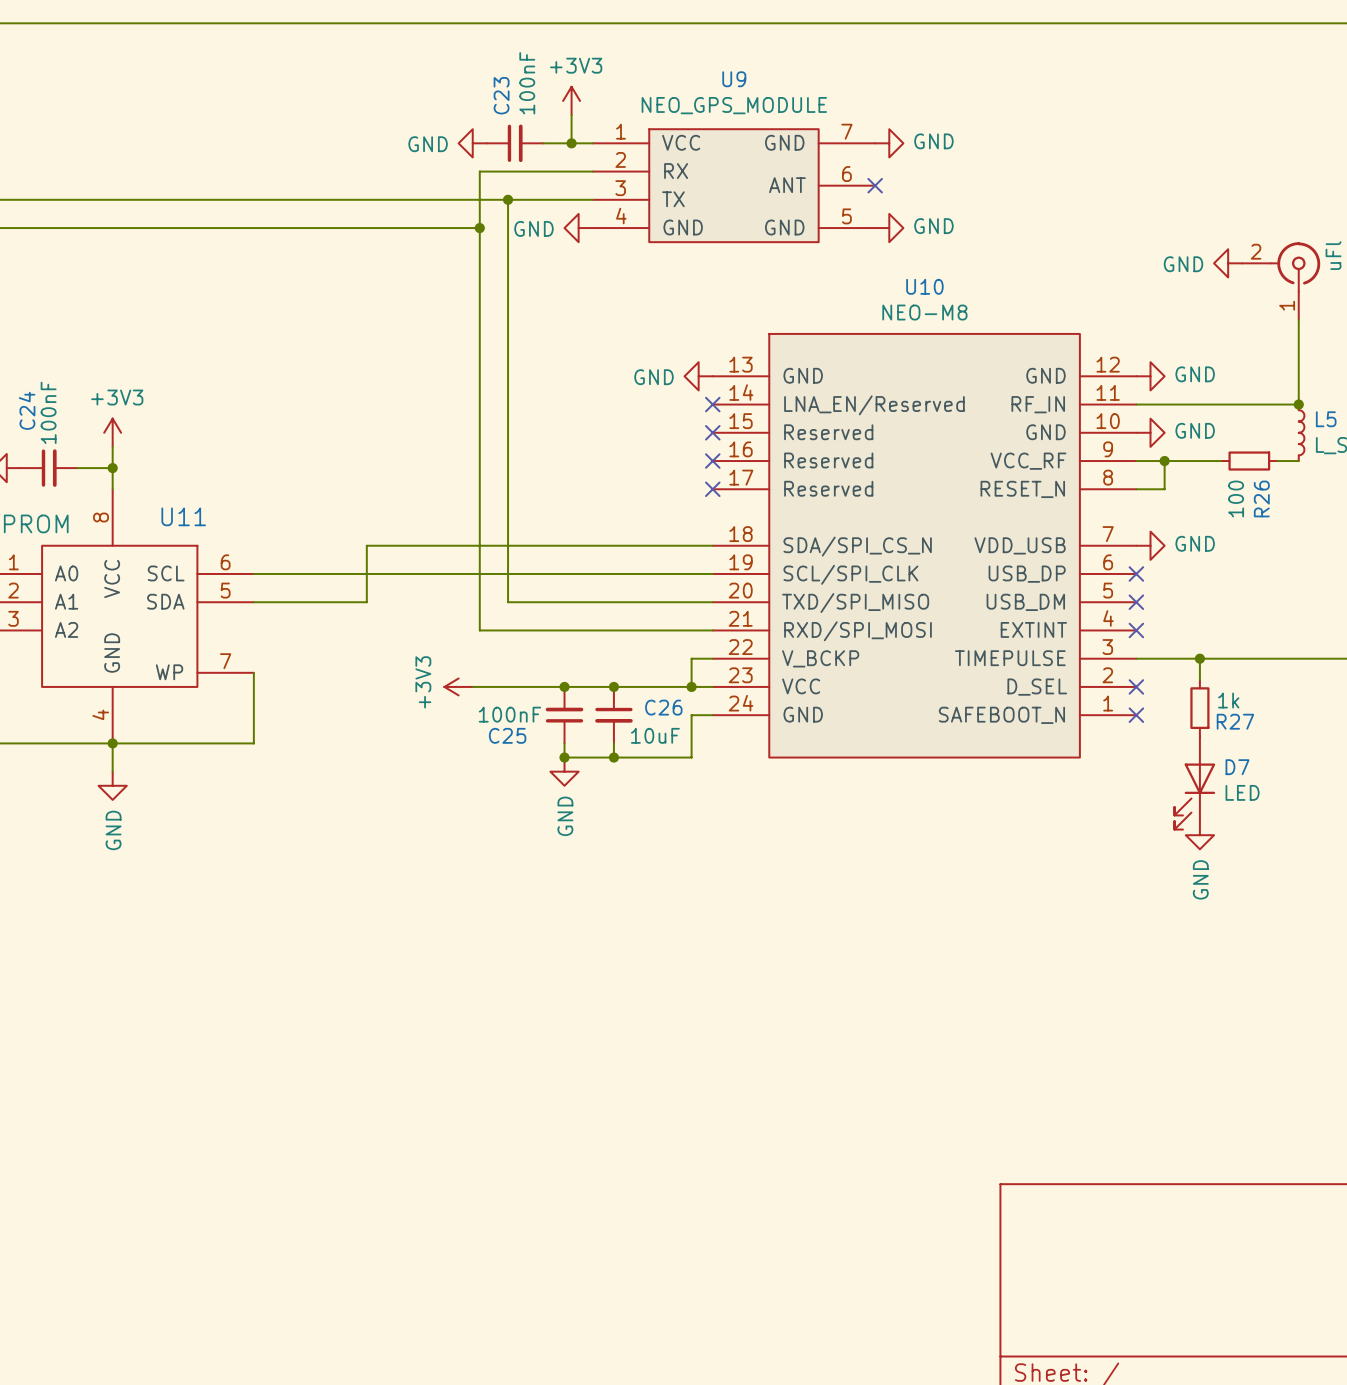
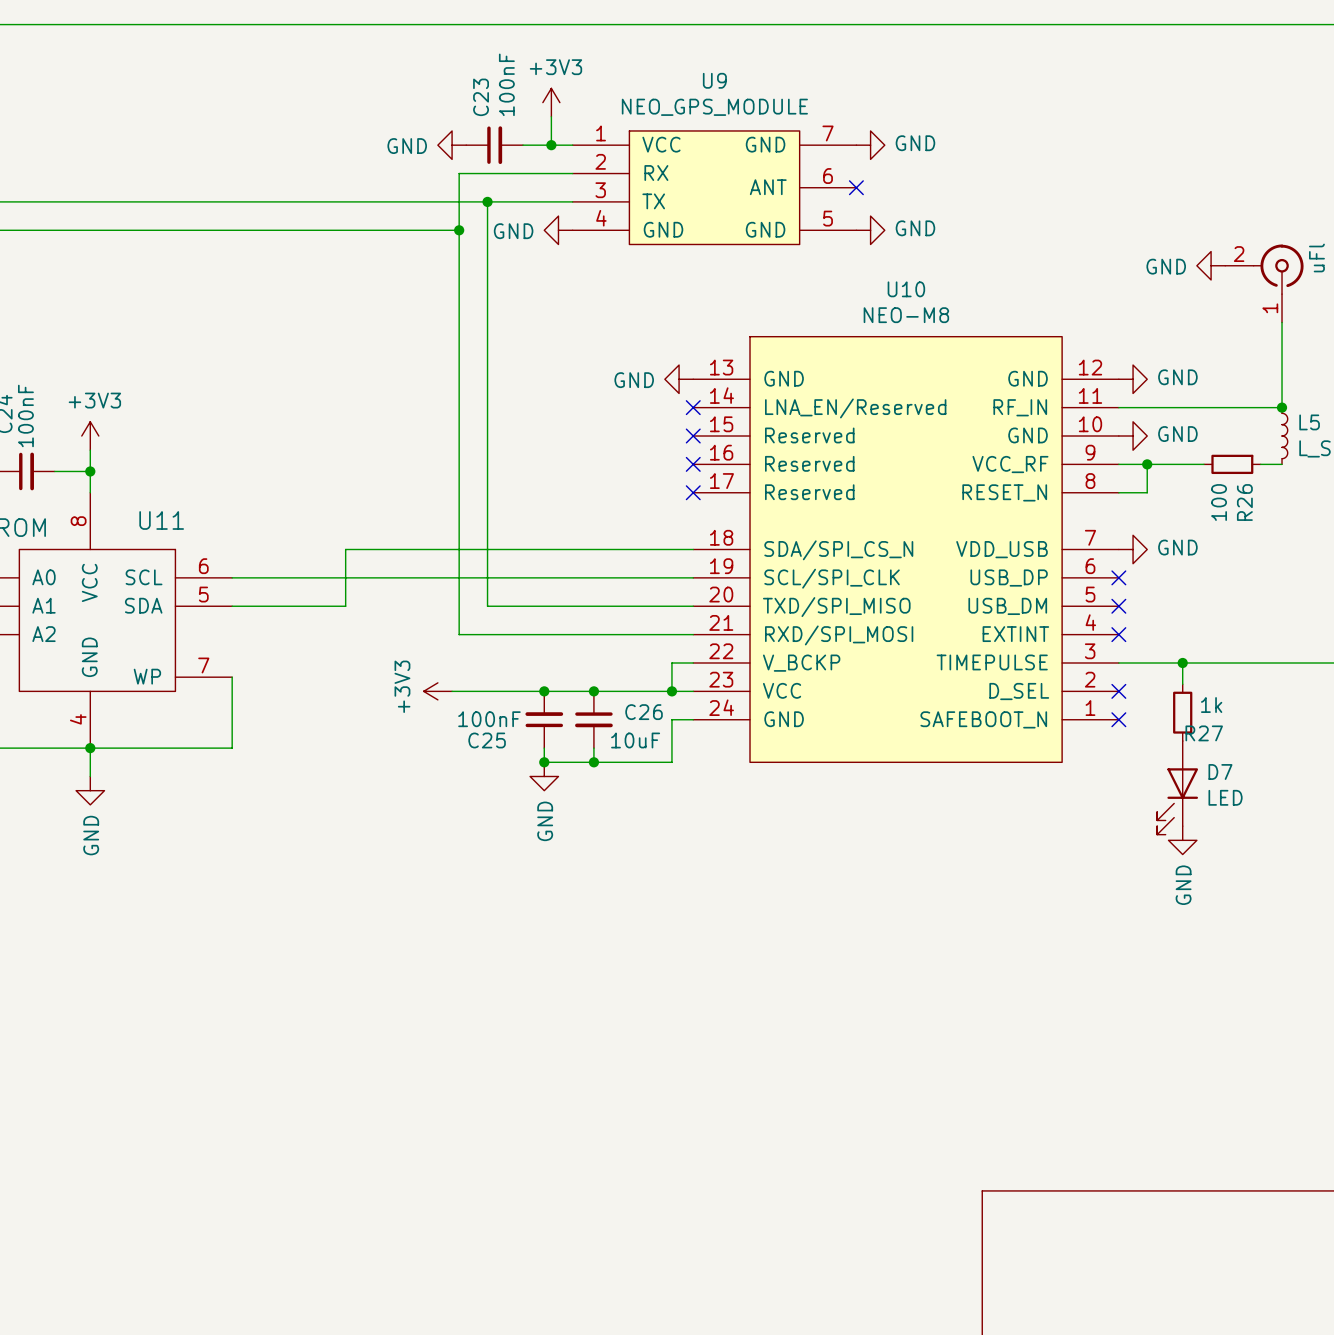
R27 name position: R27 (1235, 721) -> R27 (1204, 733)

